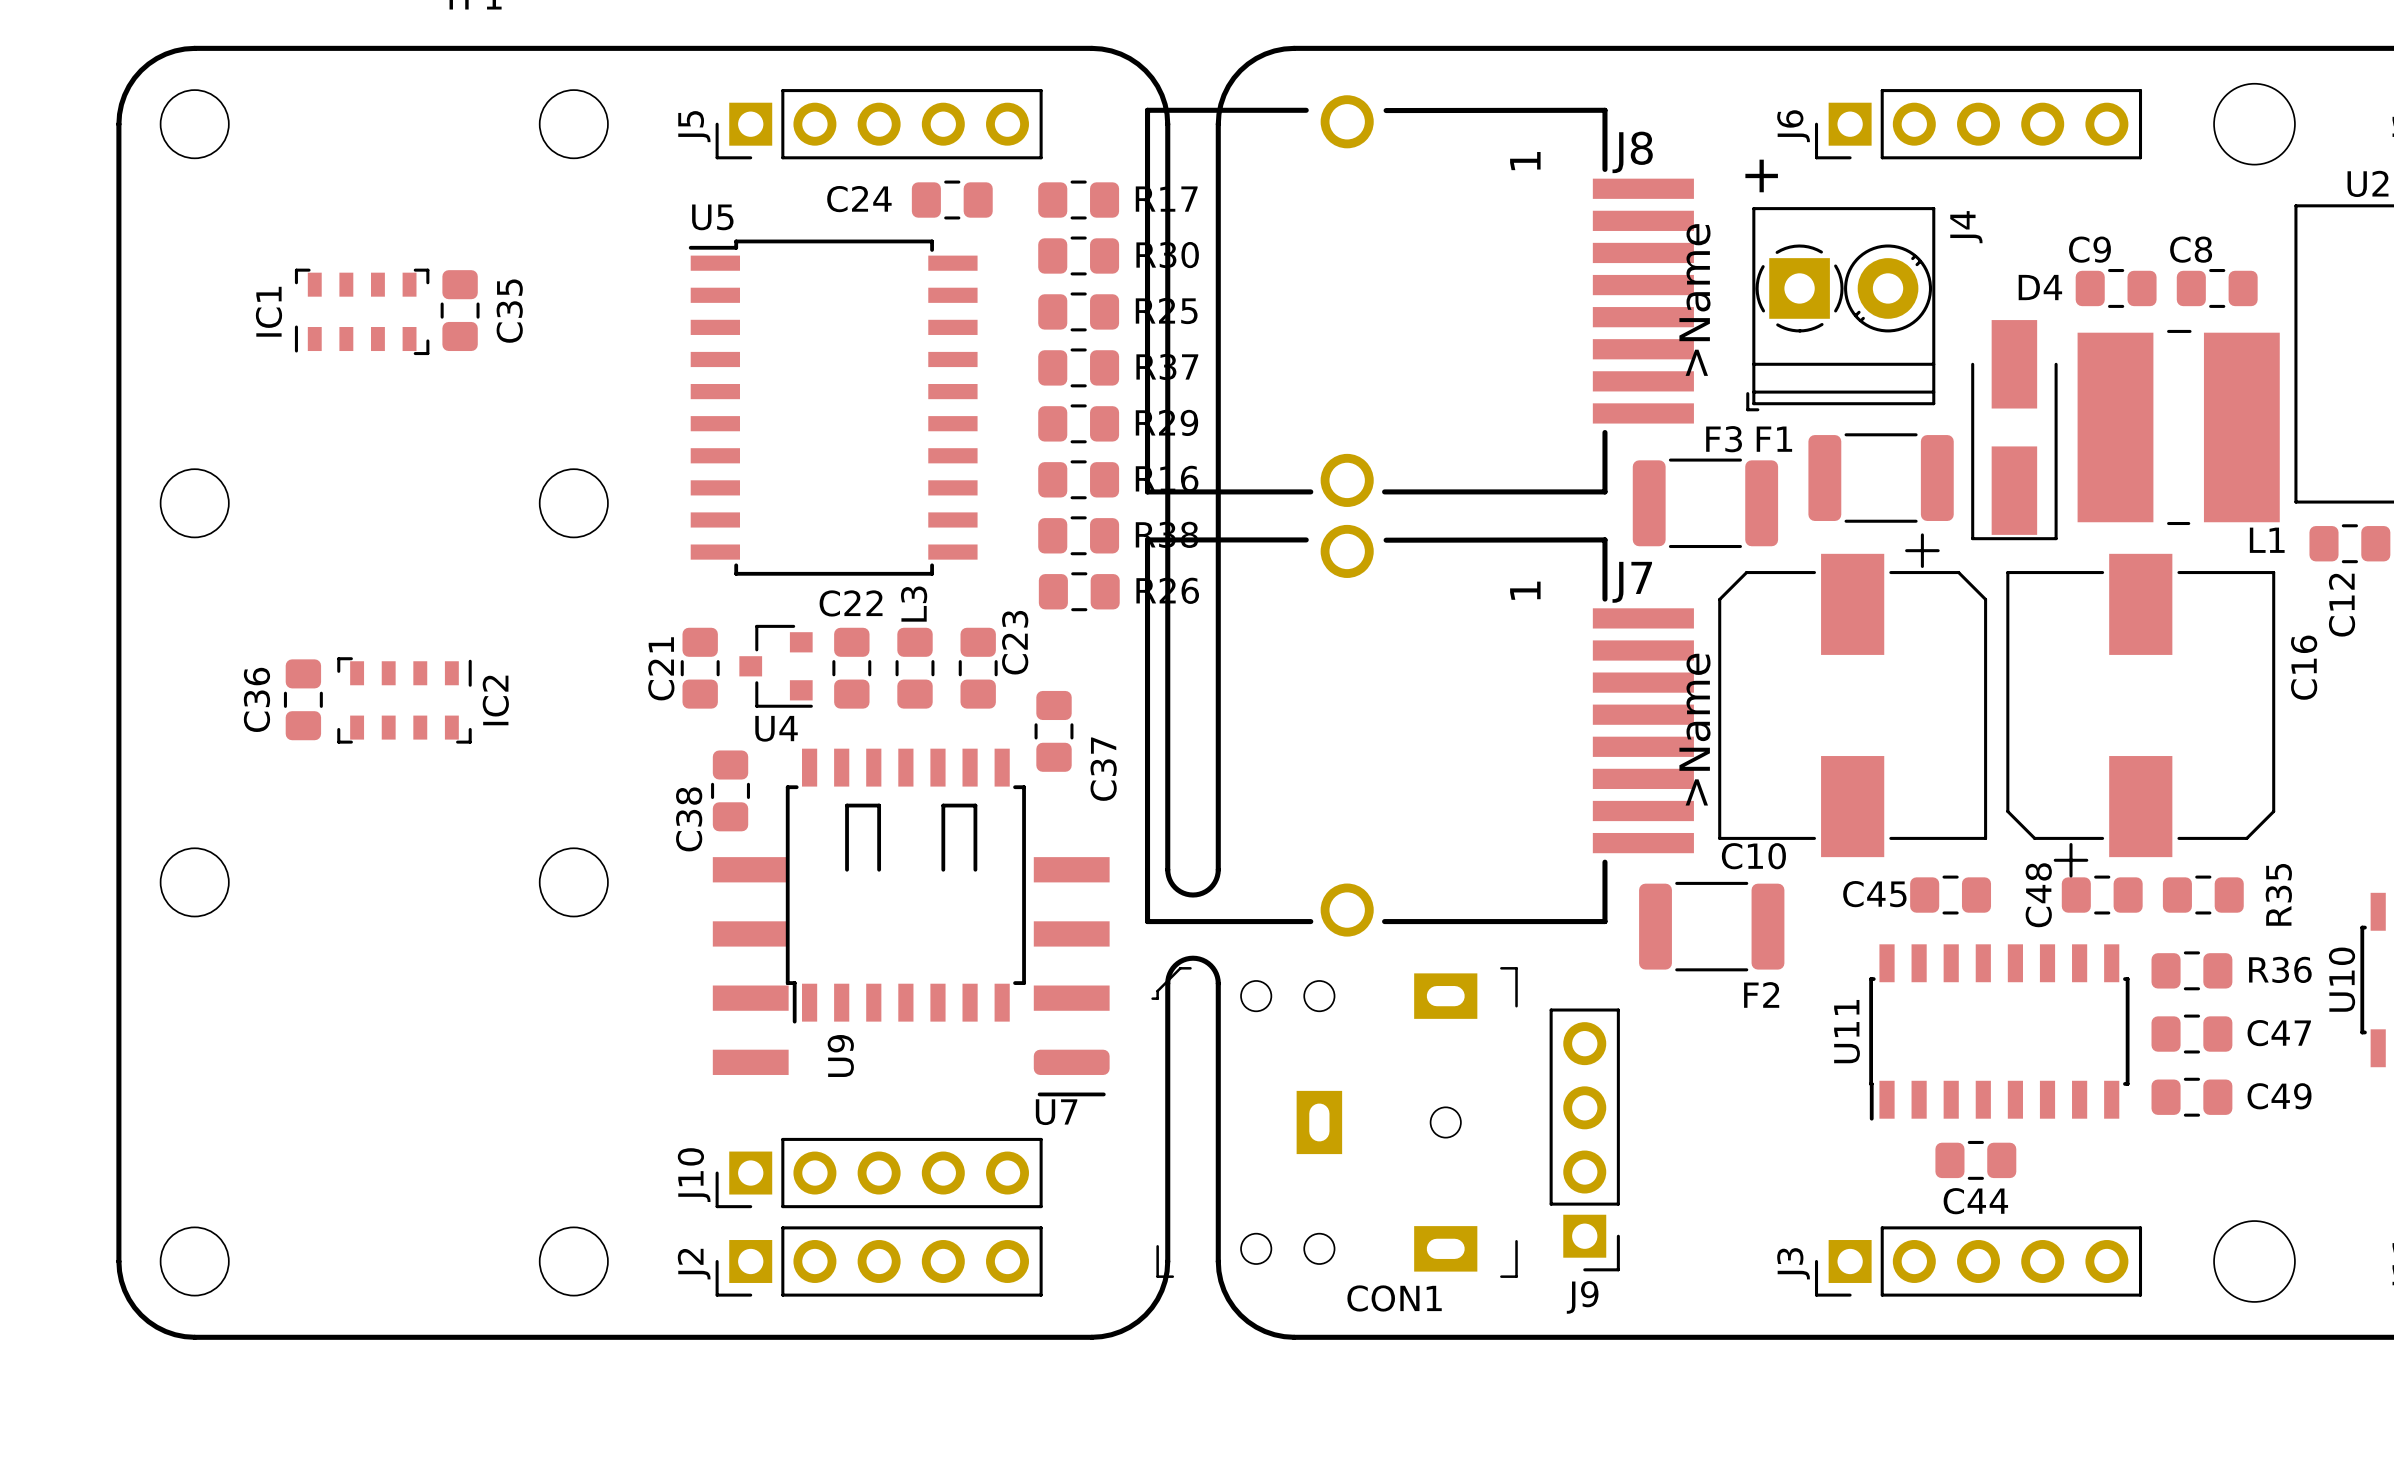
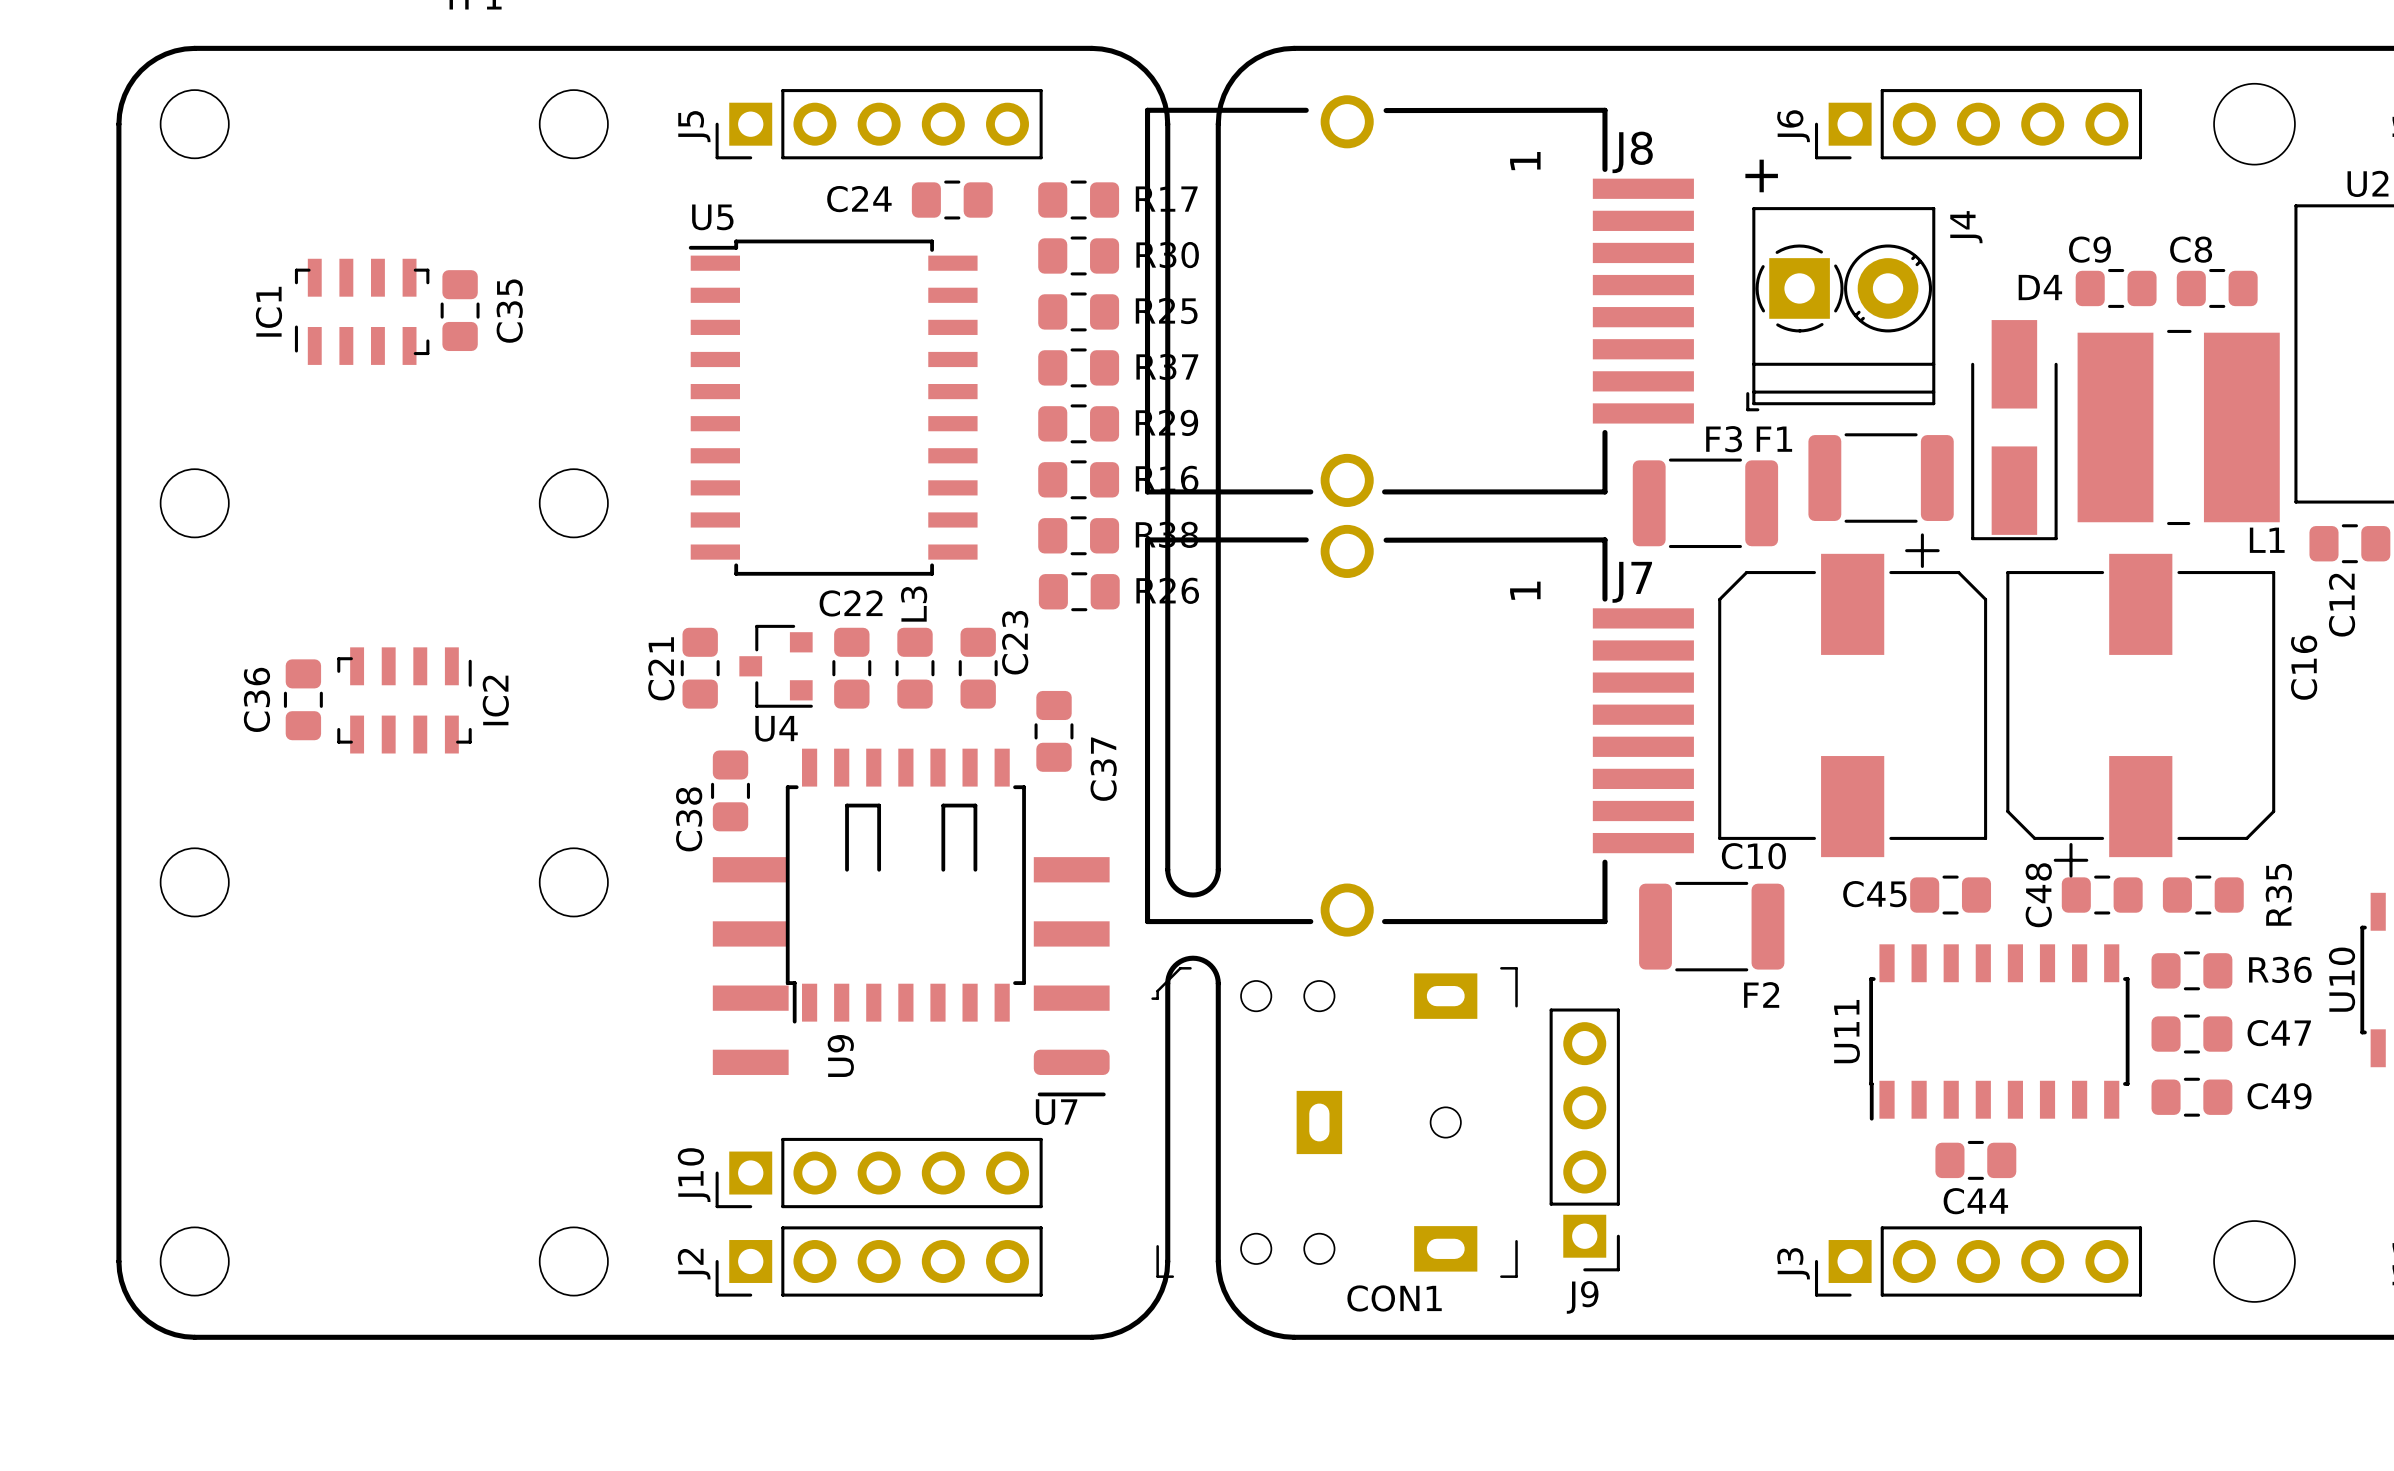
IC1 footprint: [294, 268, 430, 356] -> [294, 258, 430, 365]
J8 text: >Name (1694, 300) -> none
IC2 footprint: [337, 657, 472, 744] -> [337, 647, 472, 754]
J7 text: >Name (1694, 729) -> none

